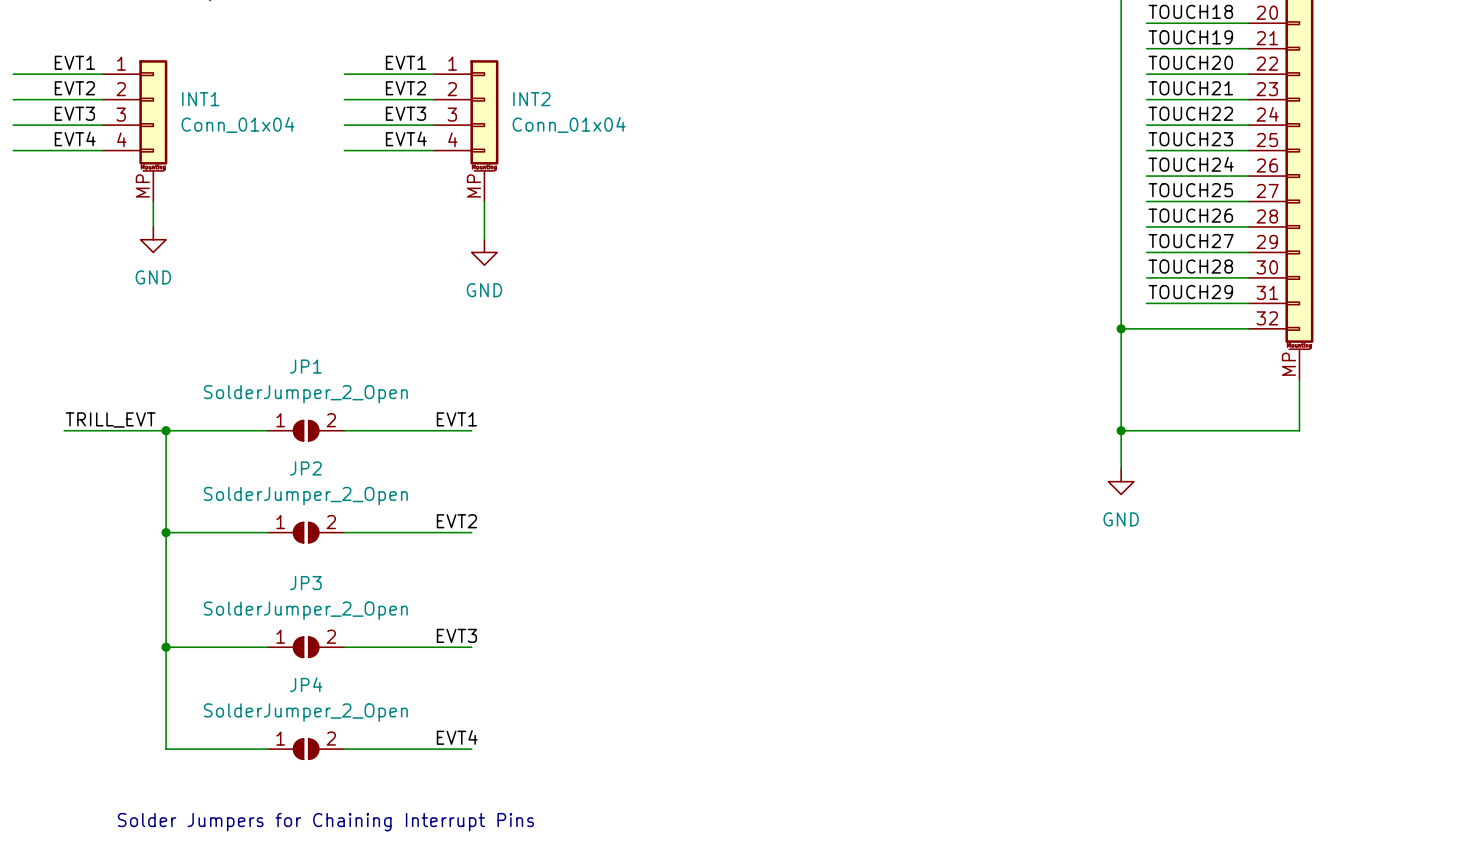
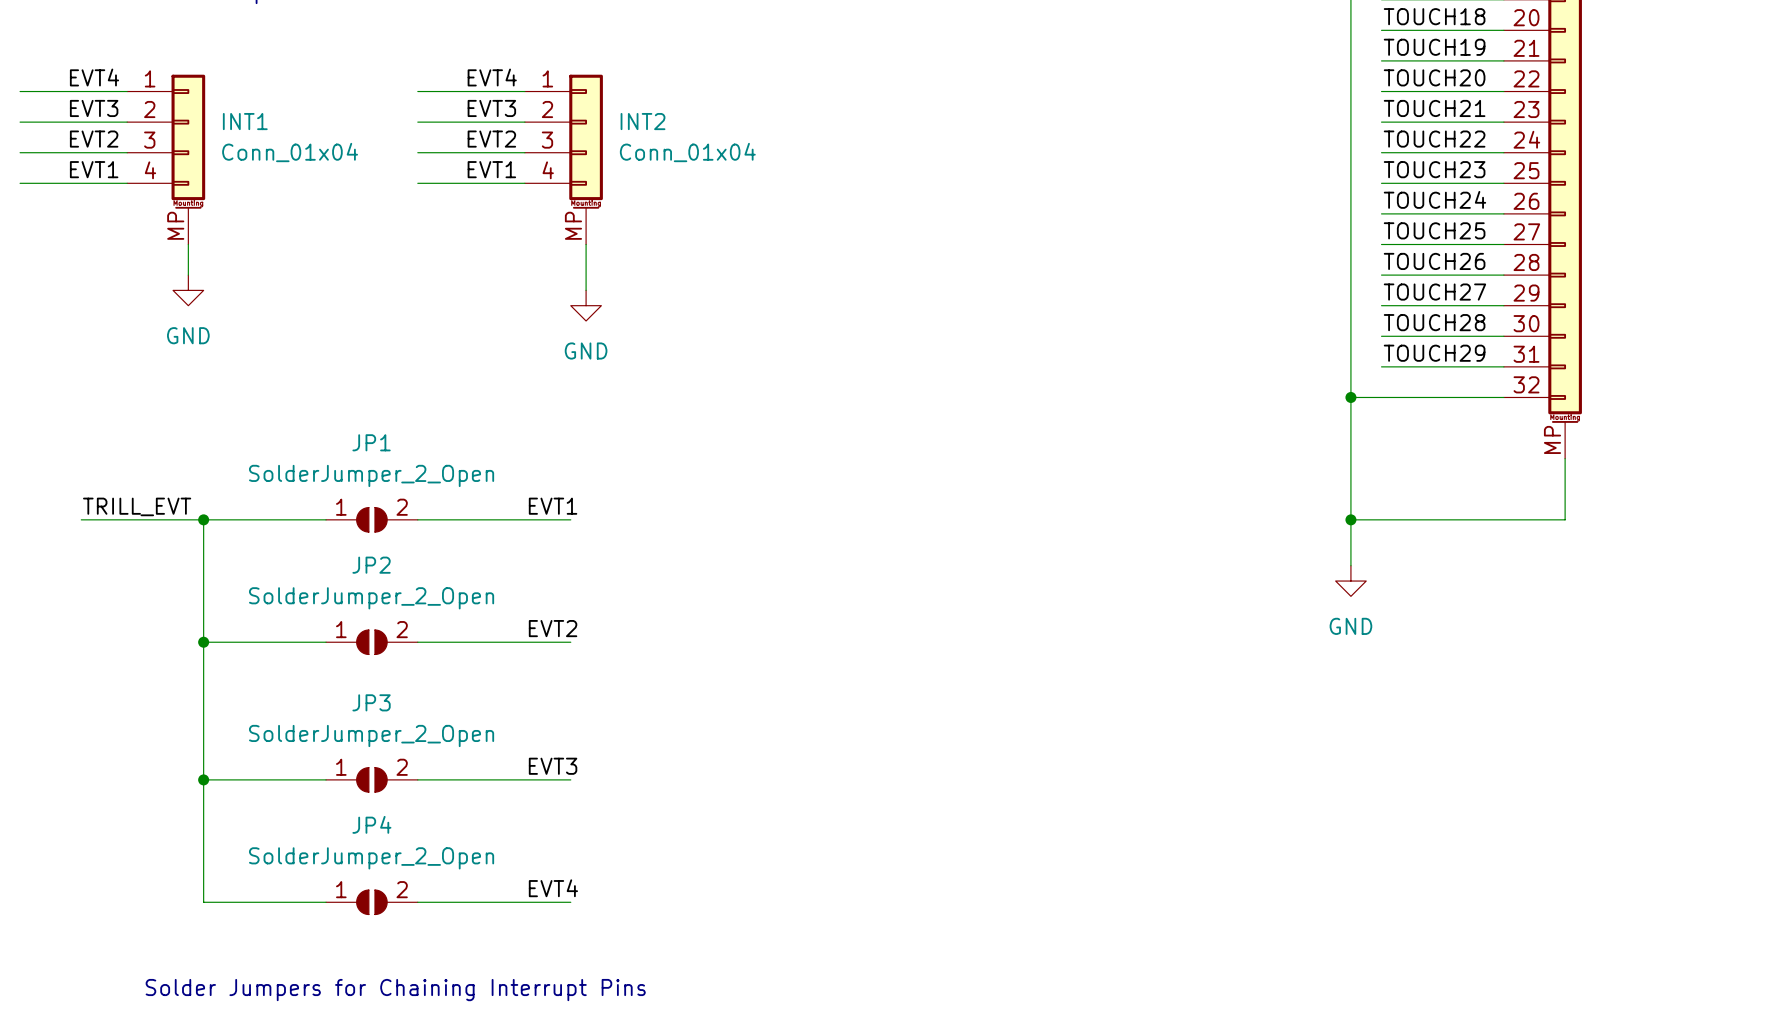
label: EVT1 (74, 62) -> EVT4 (94, 77)
label: EVT1 (405, 62) -> EVT4 (492, 77)
label: EVT2 (74, 88) -> EVT3 (94, 108)
label: EVT2 (405, 88) -> EVT3 (491, 108)
label: EVT3 (74, 113) -> EVT2 (94, 139)
label: EVT3 (405, 113) -> EVT2 (491, 139)
label: EVT4 (75, 138) -> EVT1 (94, 169)
label: EVT4 (406, 138) -> EVT1 (491, 169)

